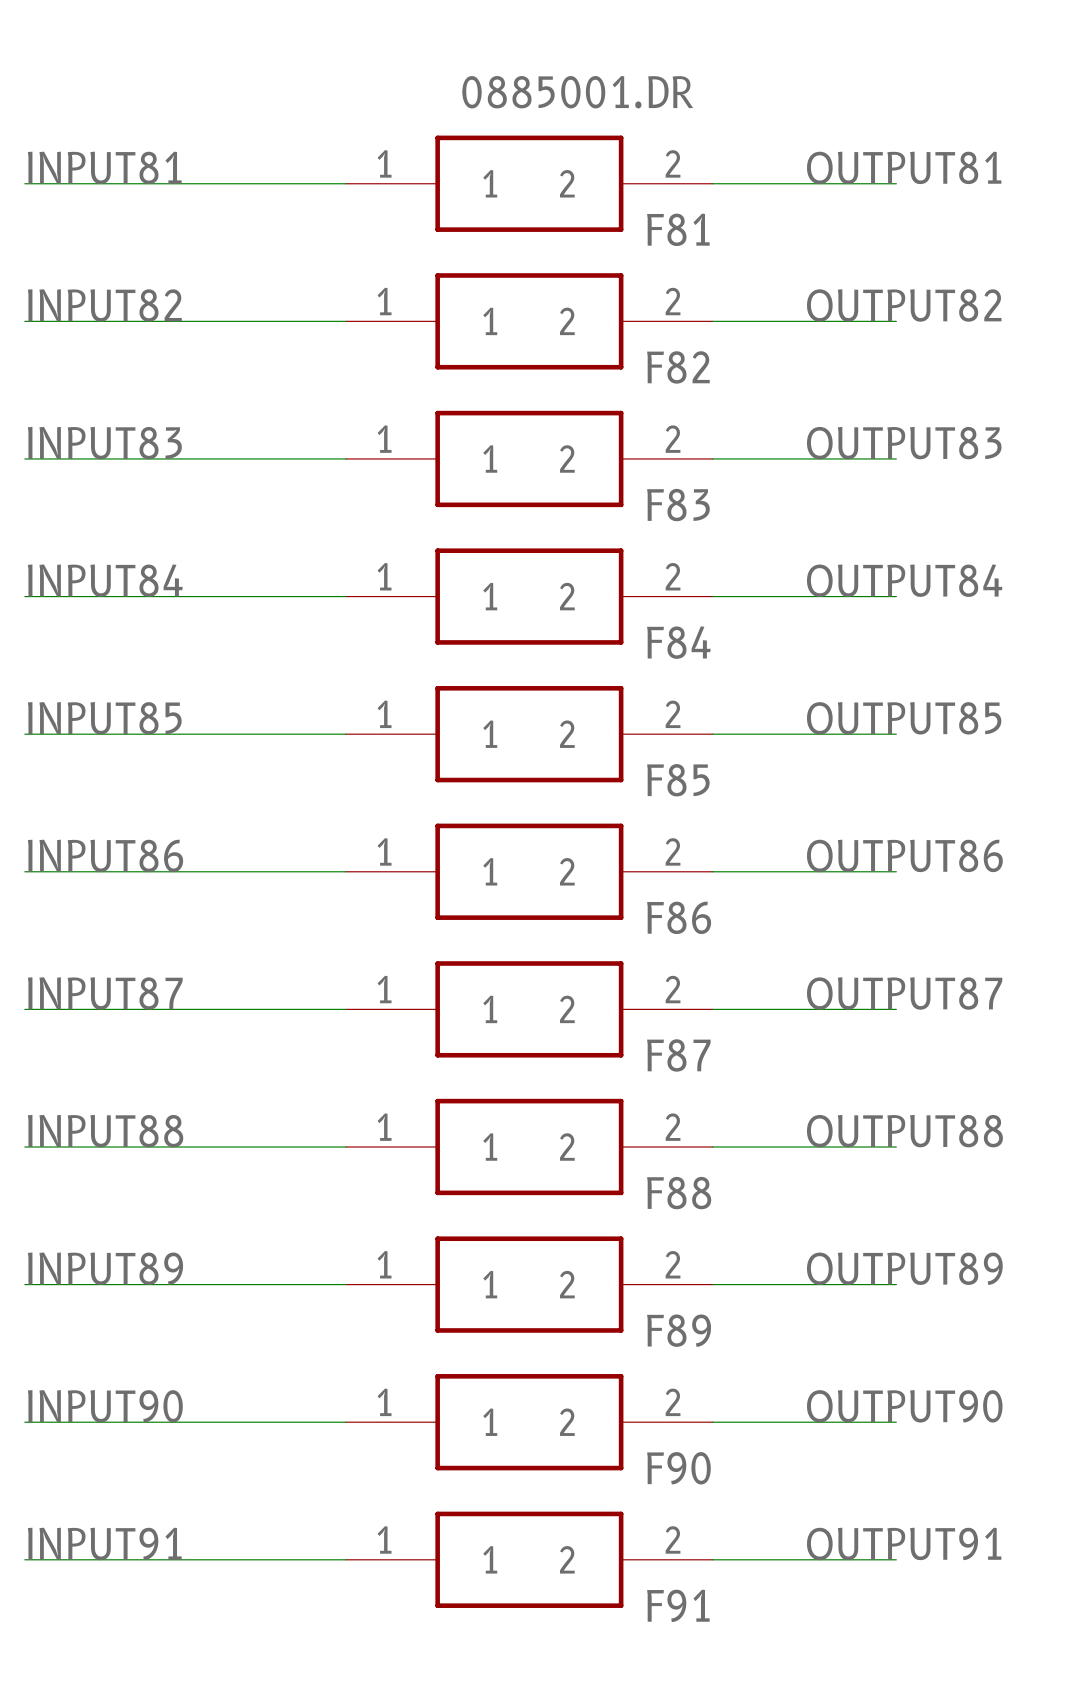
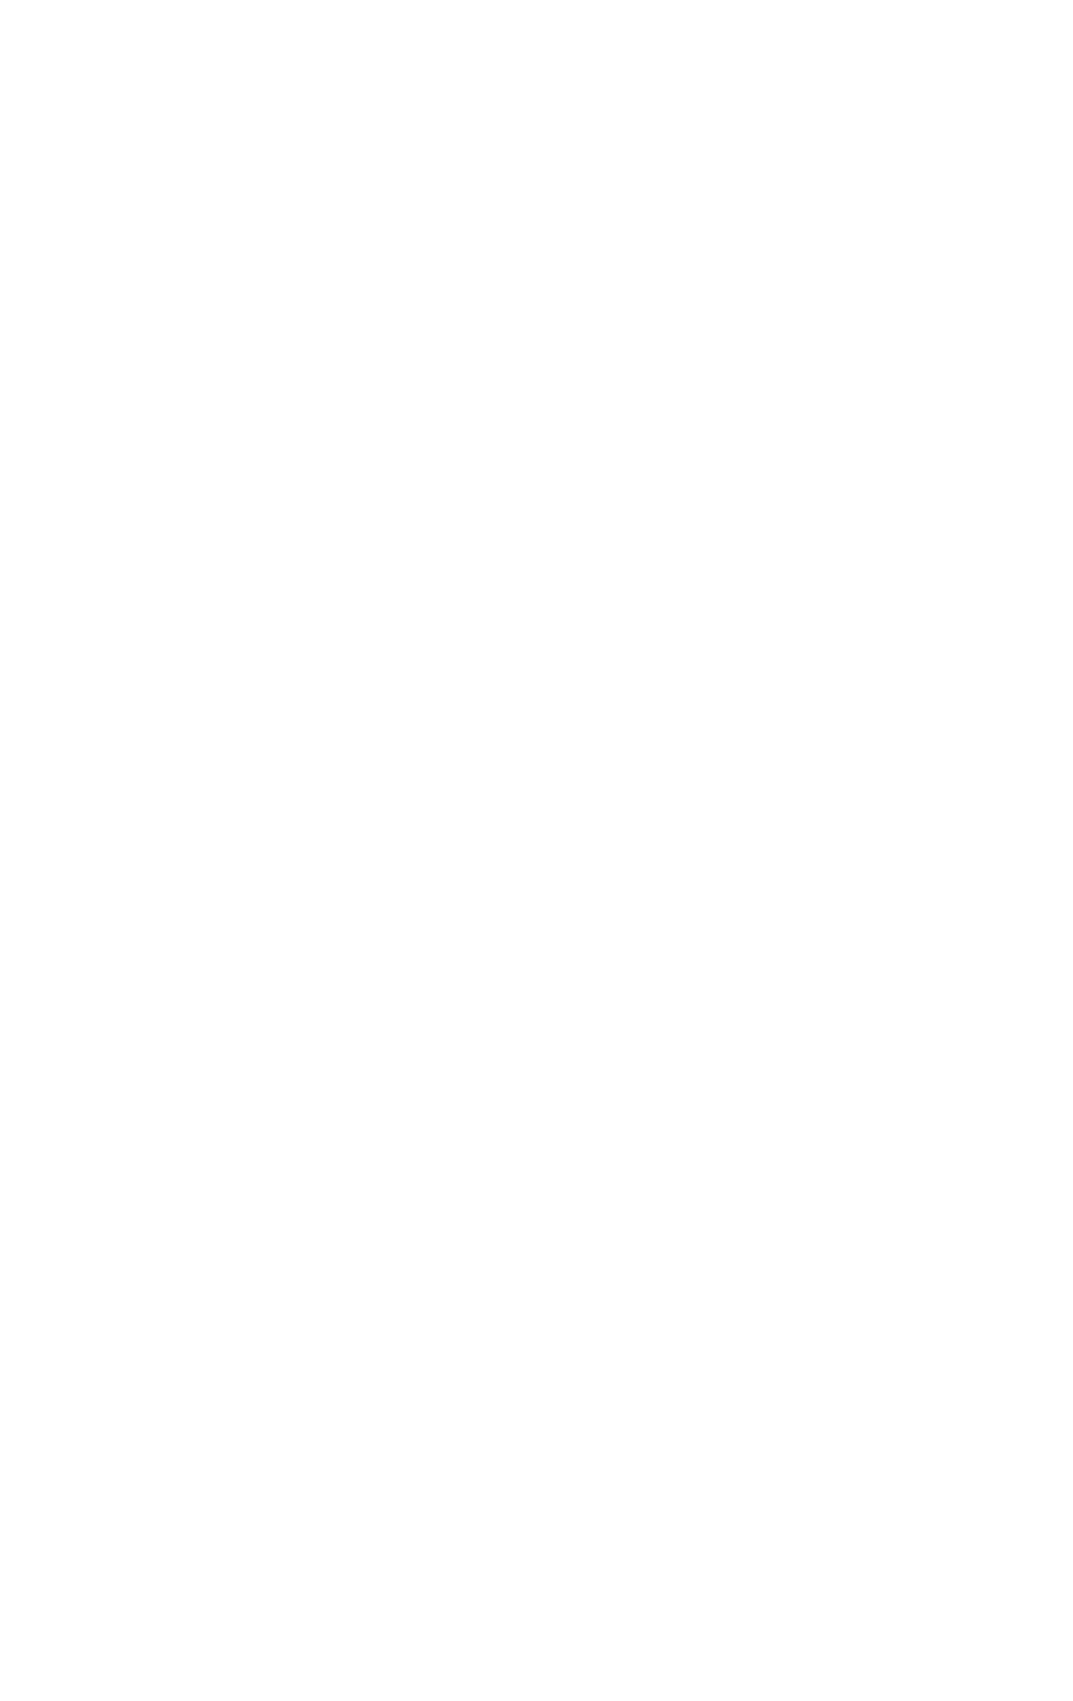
label: INPUT81 (104, 167) -> none
label: OUTPUT81 (904, 167) -> none
wire: (24, 183) (345, 183) -> none
F81: 0885001.DR (529, 183) -> none
wire: (712, 183) (896, 183) -> none
label: INPUT82 (104, 305) -> none
label: OUTPUT82 (904, 305) -> none
wire: (24, 321) (345, 321) -> none
F82: (529, 321) -> none
wire: (712, 321) (896, 321) -> none
label: INPUT83 (104, 443) -> none
label: OUTPUT83 (904, 443) -> none
wire: (24, 458) (345, 458) -> none
F83: (529, 458) -> none
wire: (712, 458) (896, 458) -> none
label: INPUT84 (105, 580) -> none
label: OUTPUT84 (904, 580) -> none
wire: (24, 596) (345, 596) -> none
F84: (529, 596) -> none
wire: (712, 596) (896, 596) -> none
label: INPUT85 (104, 718) -> none
label: OUTPUT85 (904, 718) -> none
wire: (24, 734) (345, 734) -> none
F85: (529, 734) -> none
wire: (712, 734) (896, 734) -> none
label: INPUT86 (105, 855) -> none
label: OUTPUT86 (904, 855) -> none
wire: (24, 871) (345, 871) -> none
F86: (529, 871) -> none
wire: (712, 871) (896, 871) -> none
label: INPUT87 (105, 993) -> none
label: OUTPUT87 (904, 993) -> none
wire: (24, 1009) (345, 1009) -> none
F87: (529, 1009) -> none
wire: (712, 1009) (896, 1009) -> none
label: INPUT88 (105, 1131) -> none
label: OUTPUT88 (904, 1131) -> none
wire: (24, 1146) (345, 1146) -> none
F88: (529, 1146) -> none
wire: (712, 1146) (896, 1146) -> none
label: INPUT89 (105, 1268) -> none
label: OUTPUT89 (904, 1268) -> none
wire: (24, 1284) (345, 1284) -> none
F89: (529, 1284) -> none
wire: (712, 1284) (896, 1284) -> none
label: INPUT90 (105, 1406) -> none
label: OUTPUT90 (904, 1406) -> none
wire: (24, 1422) (345, 1422) -> none
F90: (529, 1422) -> none
wire: (712, 1422) (896, 1422) -> none
label: INPUT91 (104, 1543) -> none
label: OUTPUT91 (904, 1543) -> none
wire: (24, 1559) (345, 1559) -> none
F91: (529, 1559) -> none
wire: (712, 1559) (896, 1559) -> none

